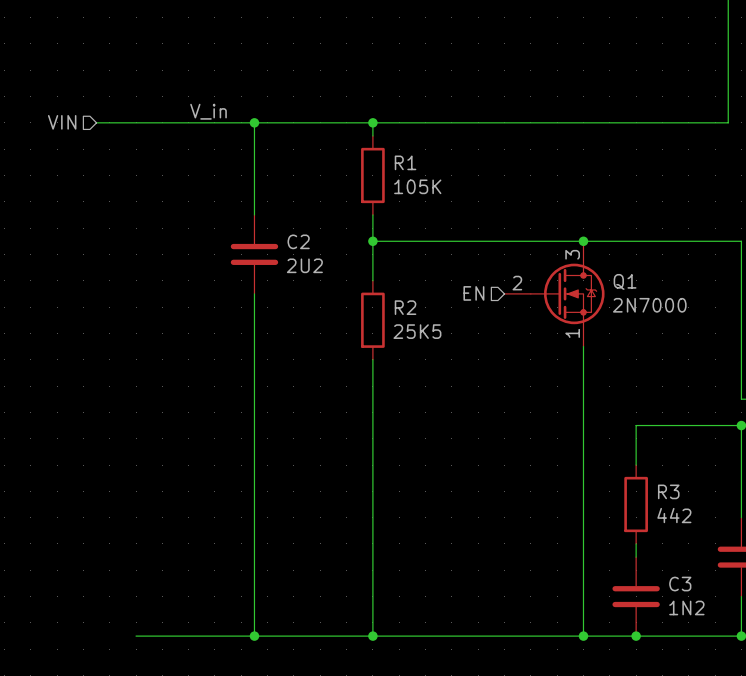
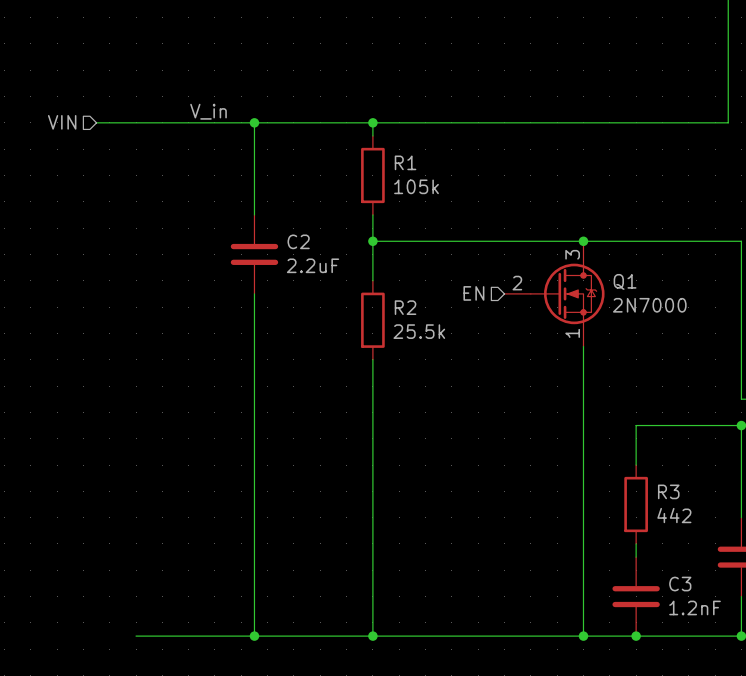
R1 value: 105K (417, 186) -> 105k (416, 186)
C2 value: 2U2 (304, 265) -> 2.2uF (313, 265)
R2 value: 25K5 (417, 331) -> 25.5k (419, 331)
C3 value: 1N2 (686, 607) -> 1.2nF (695, 607)

